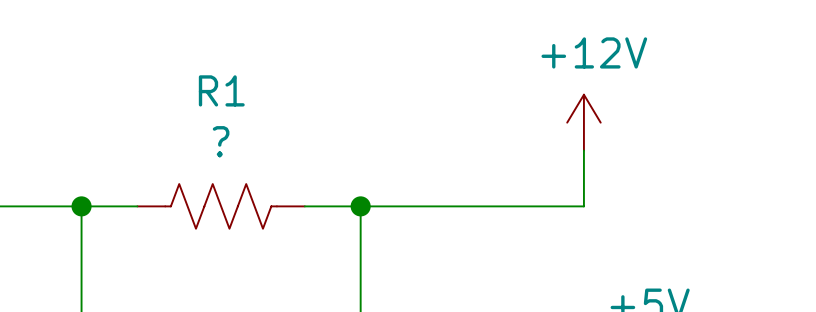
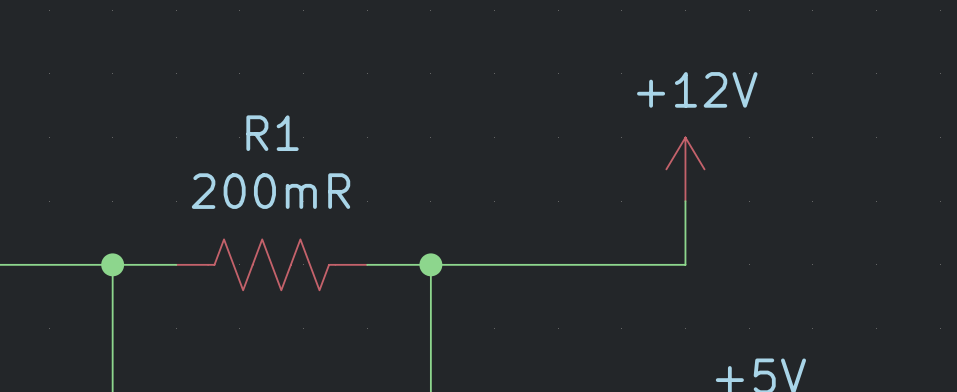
R1 value: ? (221, 141) -> 200mR (271, 191)

